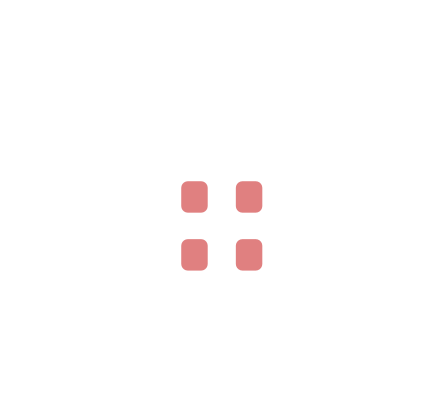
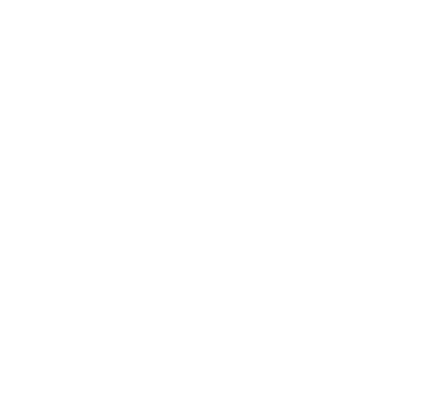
part: (221, 196) -> none
part: (221, 254) -> none

